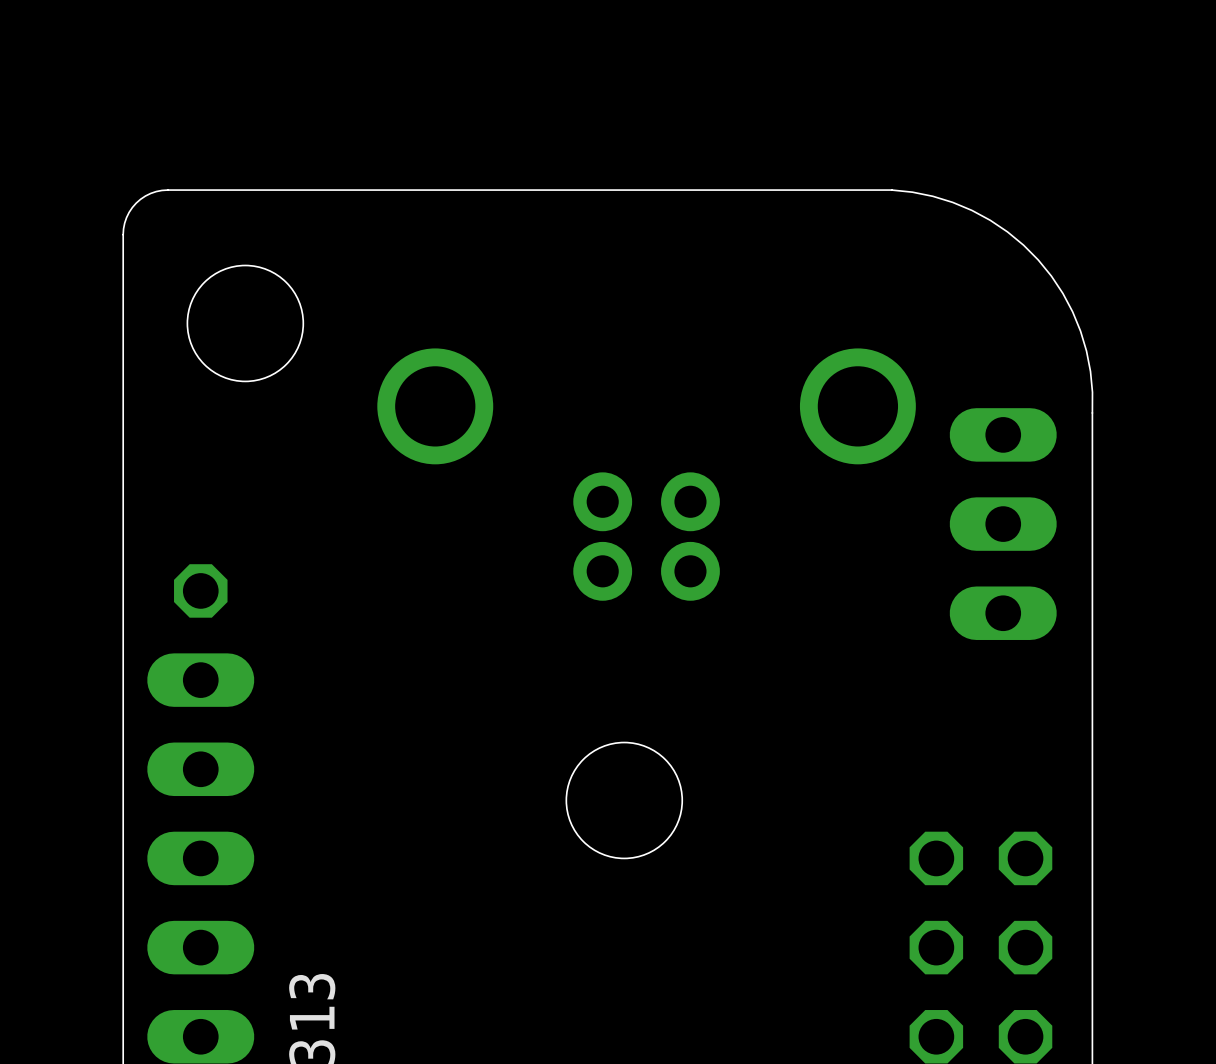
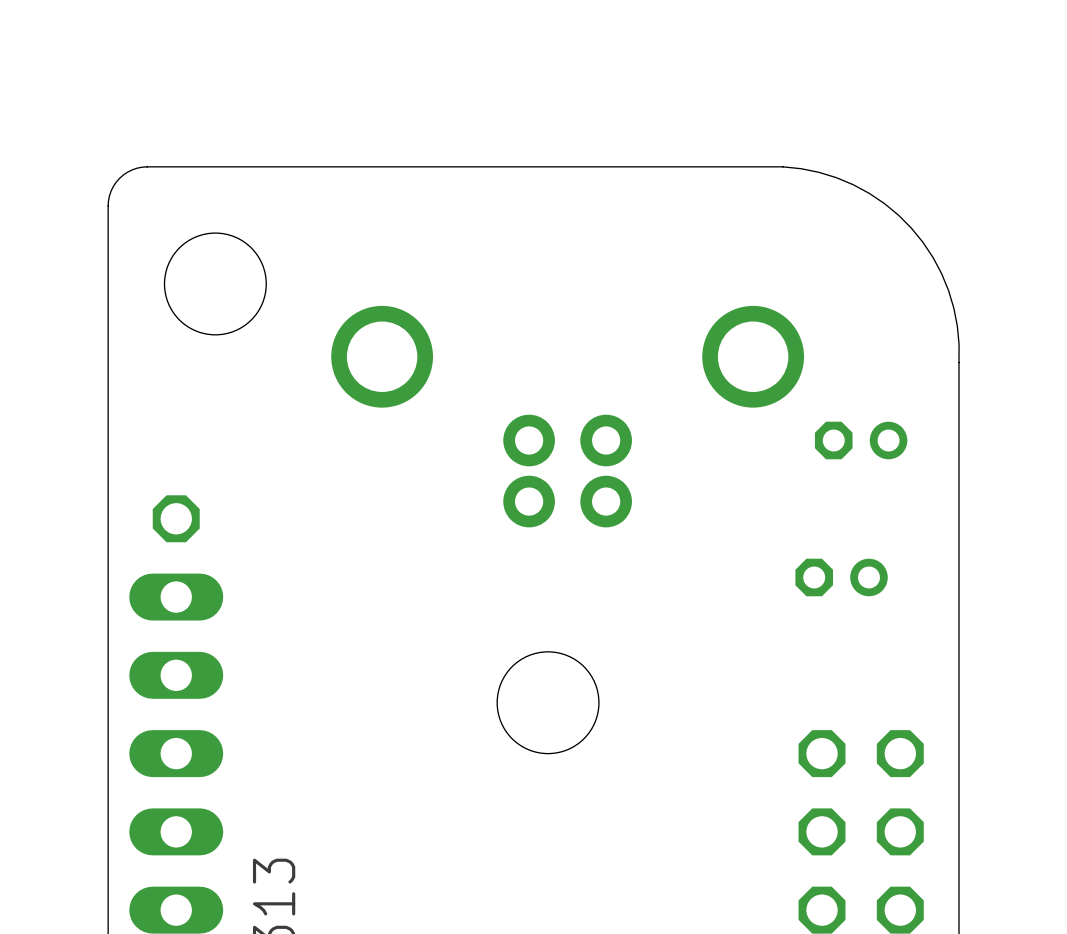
part footprint: [949, 408, 1057, 640] -> [814, 421, 908, 460]
part: none -> (841, 577)

